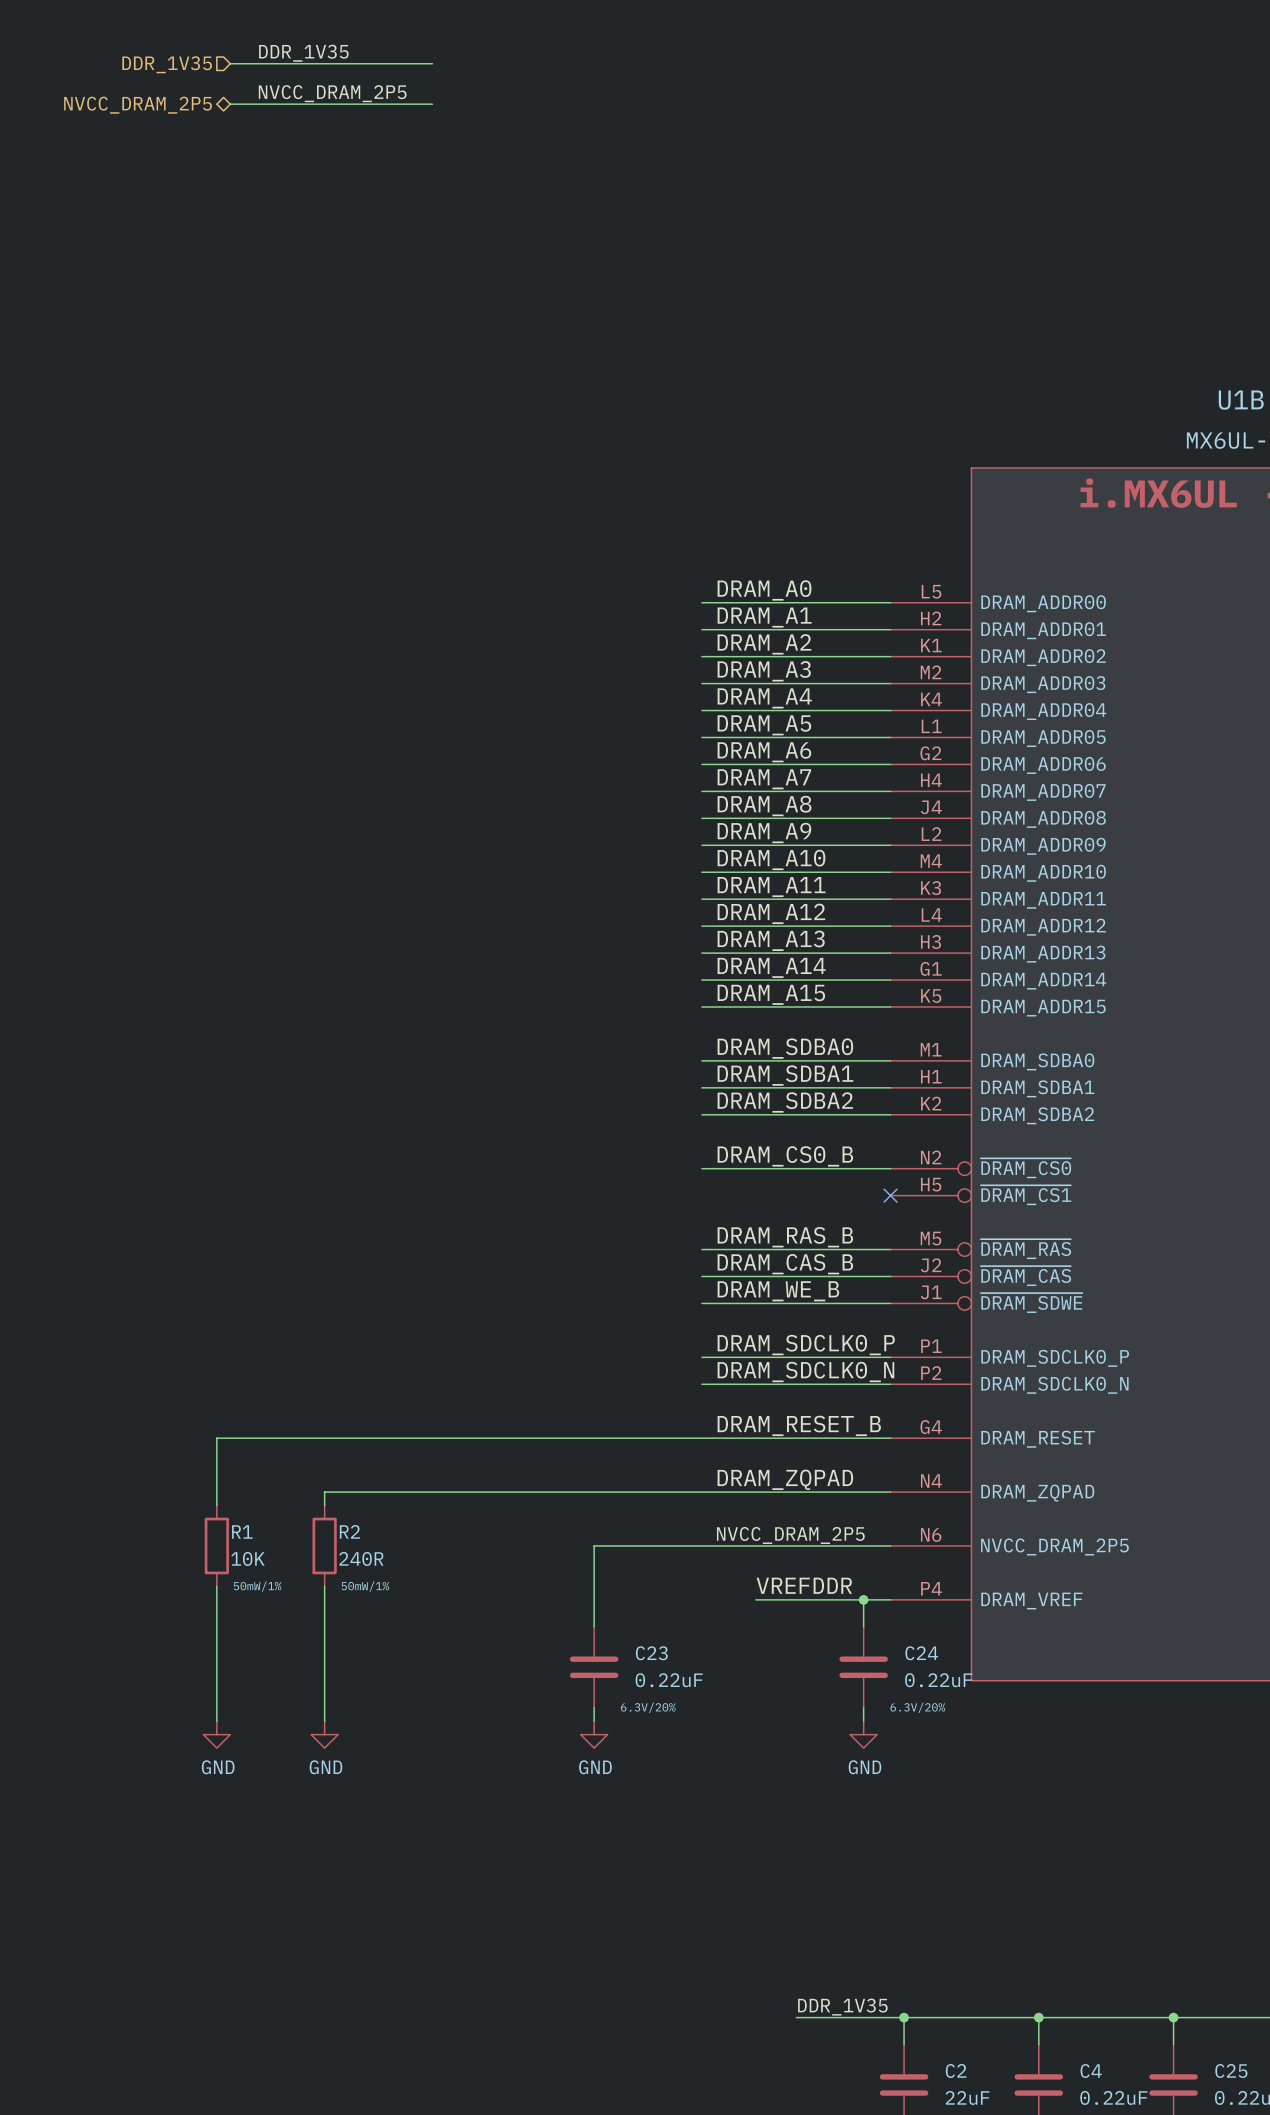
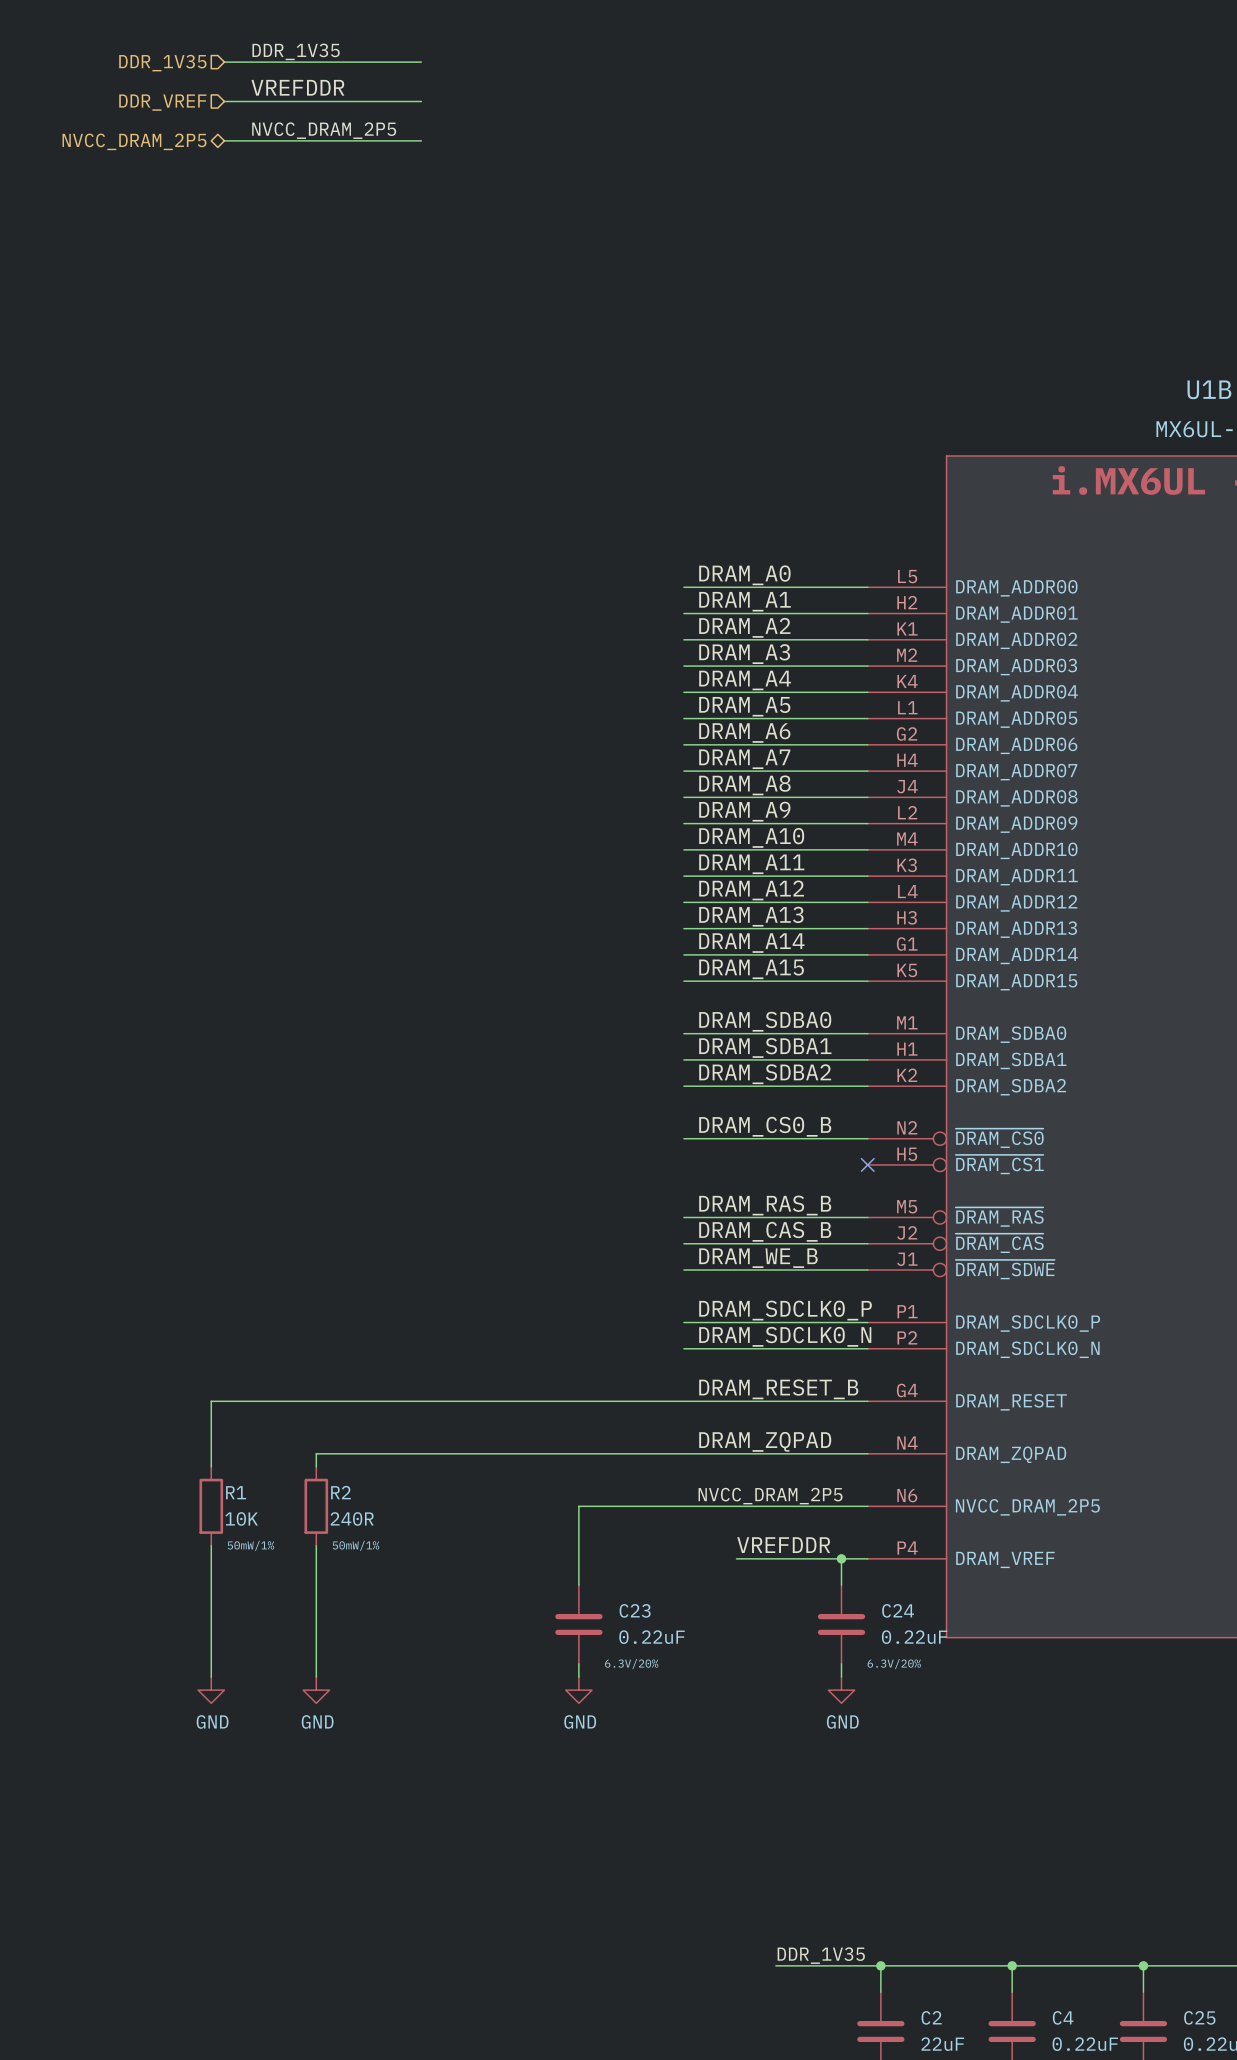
label: NVCC_DRAM_2P5 (332, 93) -> VREFDDR (297, 87)
hierarchical label shape: bidirectional (138, 105) -> input (162, 102)
hierarchical label: NVCC_DRAM_2P5 (138, 105) -> DDR_VREF (162, 102)
label: none -> NVCC_DRAM_2P5 (324, 130)
wire: none -> (224, 140) (421, 140)
hierarchical label: none -> NVCC_DRAM_2P5 (134, 141)

